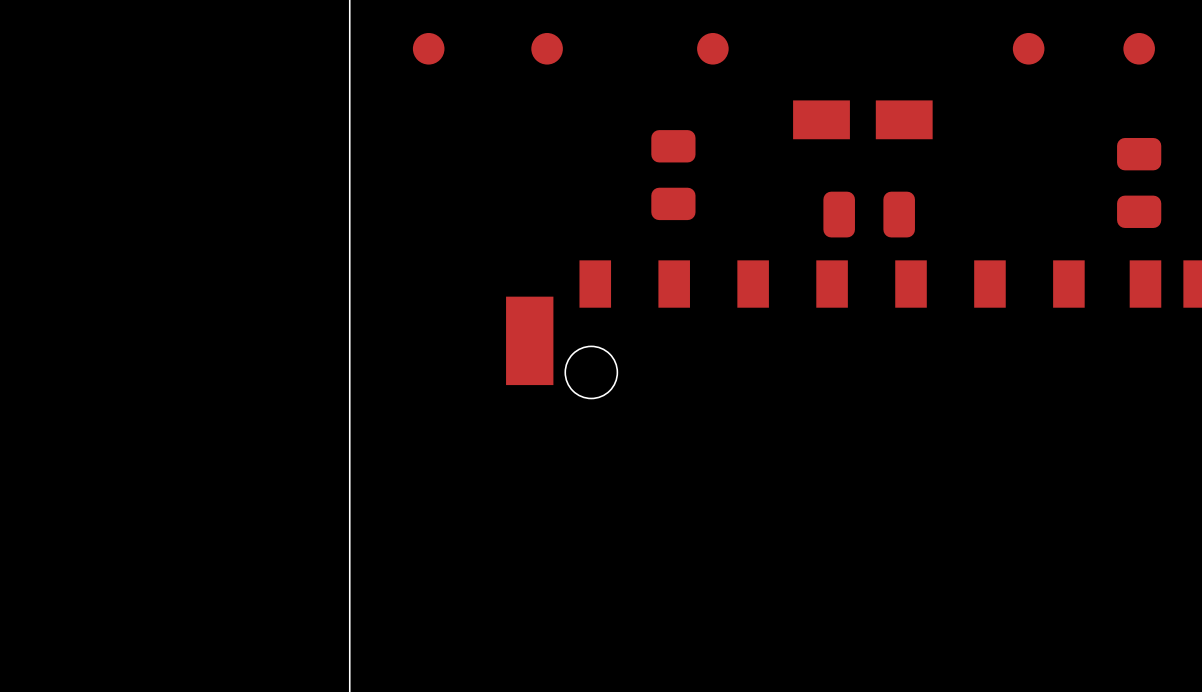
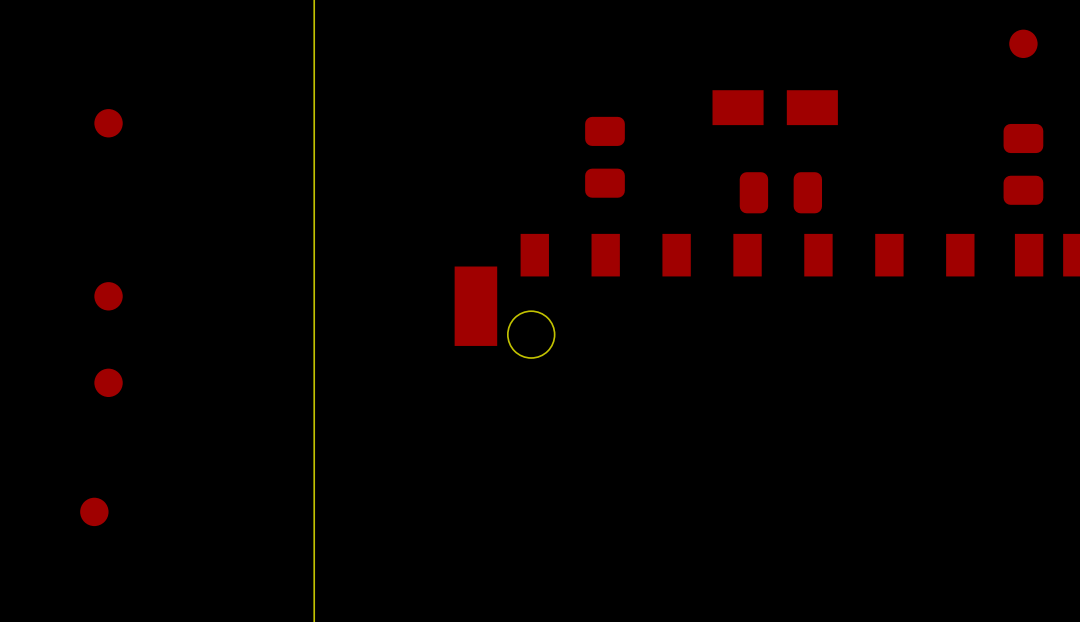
part: (428, 48) -> none
part: (547, 48) -> none
part: (712, 48) -> none
part: (1028, 48) -> none
part: none -> (108, 123)
part: none -> (108, 296)
part: none -> (108, 382)
part: none -> (94, 511)

